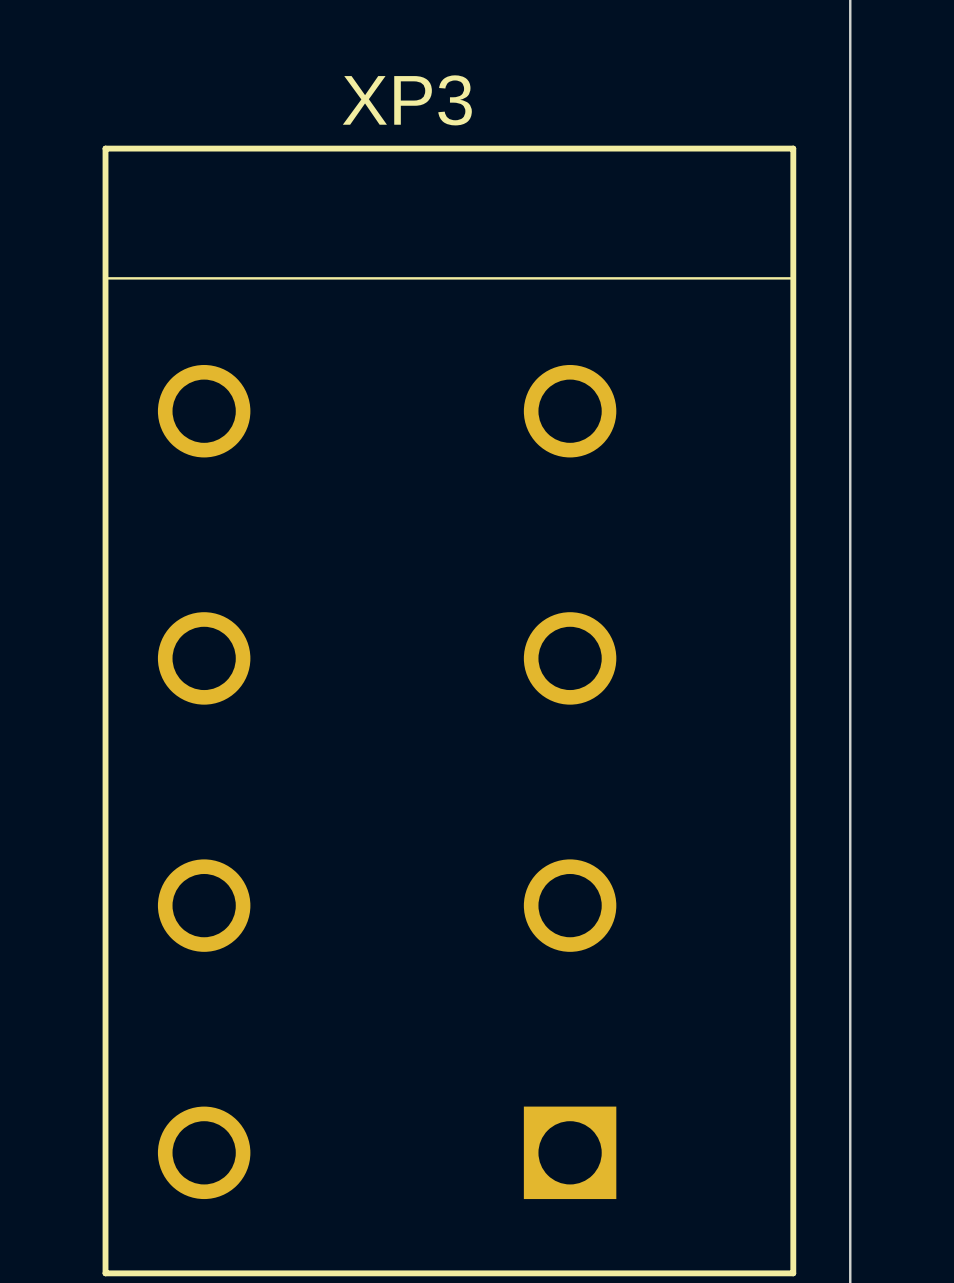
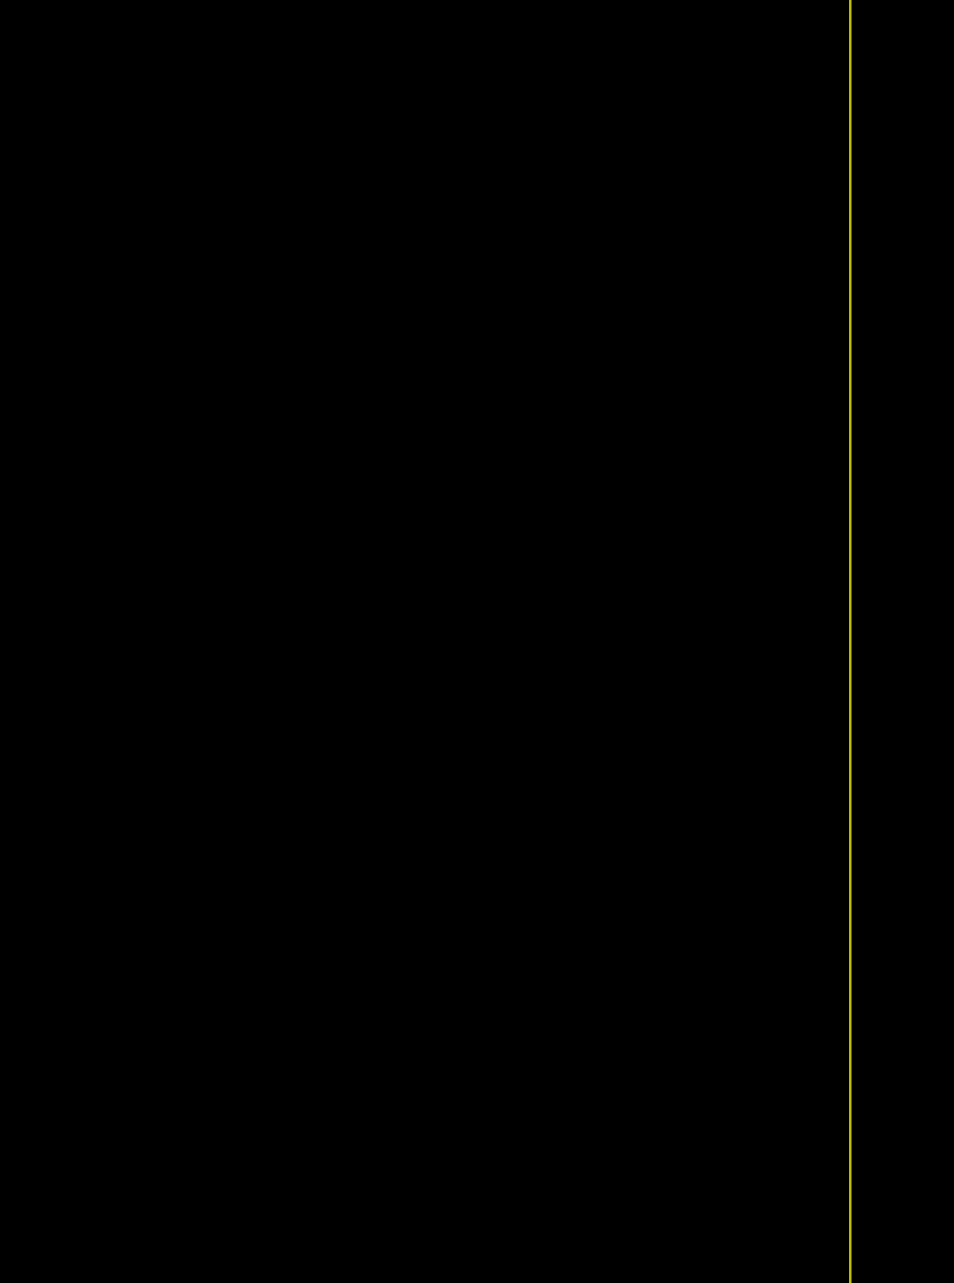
XP3: (449, 710) -> none

